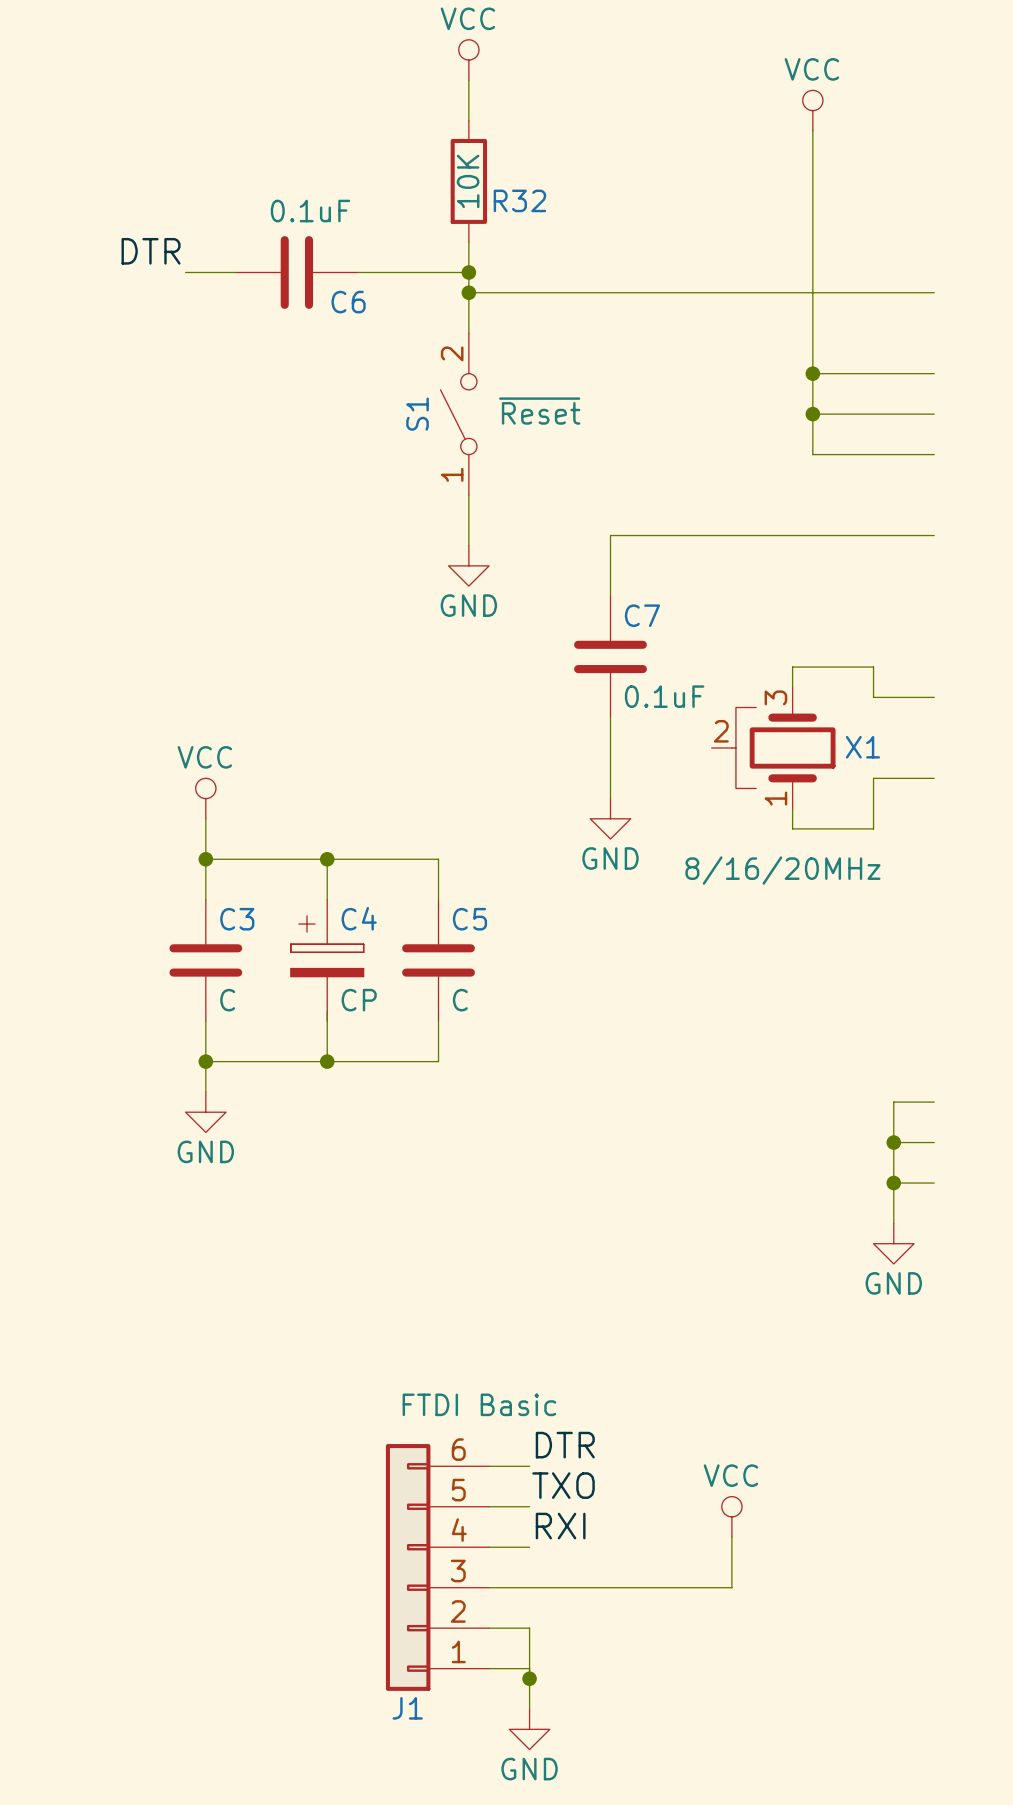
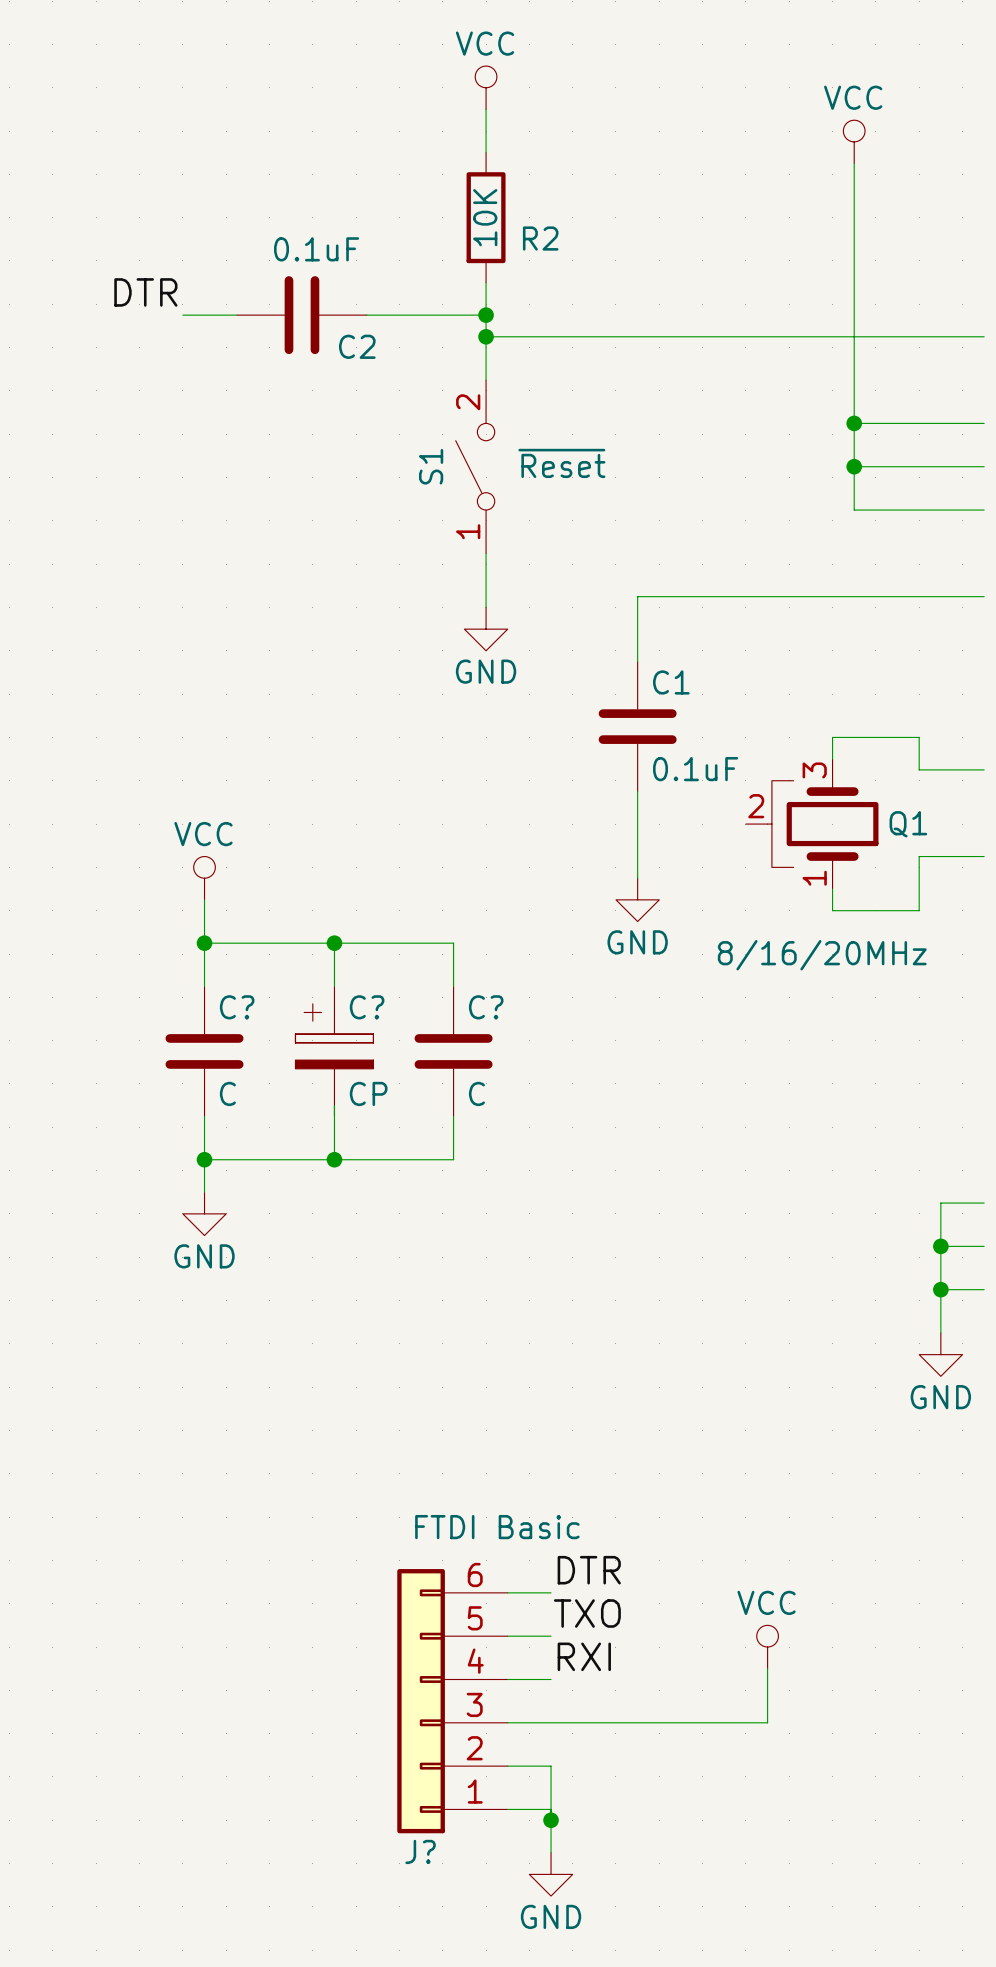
R32 name: R32 (519, 200) -> R2 (540, 238)
C6 name: C6 (348, 302) -> C2 (357, 346)
C7 name: C7 (642, 615) -> C1 (671, 682)
X1 name: X1 (862, 747) -> Q1 (908, 824)
C4 name: C4 (359, 918) -> C? (367, 1007)
C3 name: C3 (237, 919) -> C? (237, 1007)
C5 name: C5 (469, 919) -> C? (486, 1007)
J1 name: J1 (407, 1708) -> J? (420, 1851)

